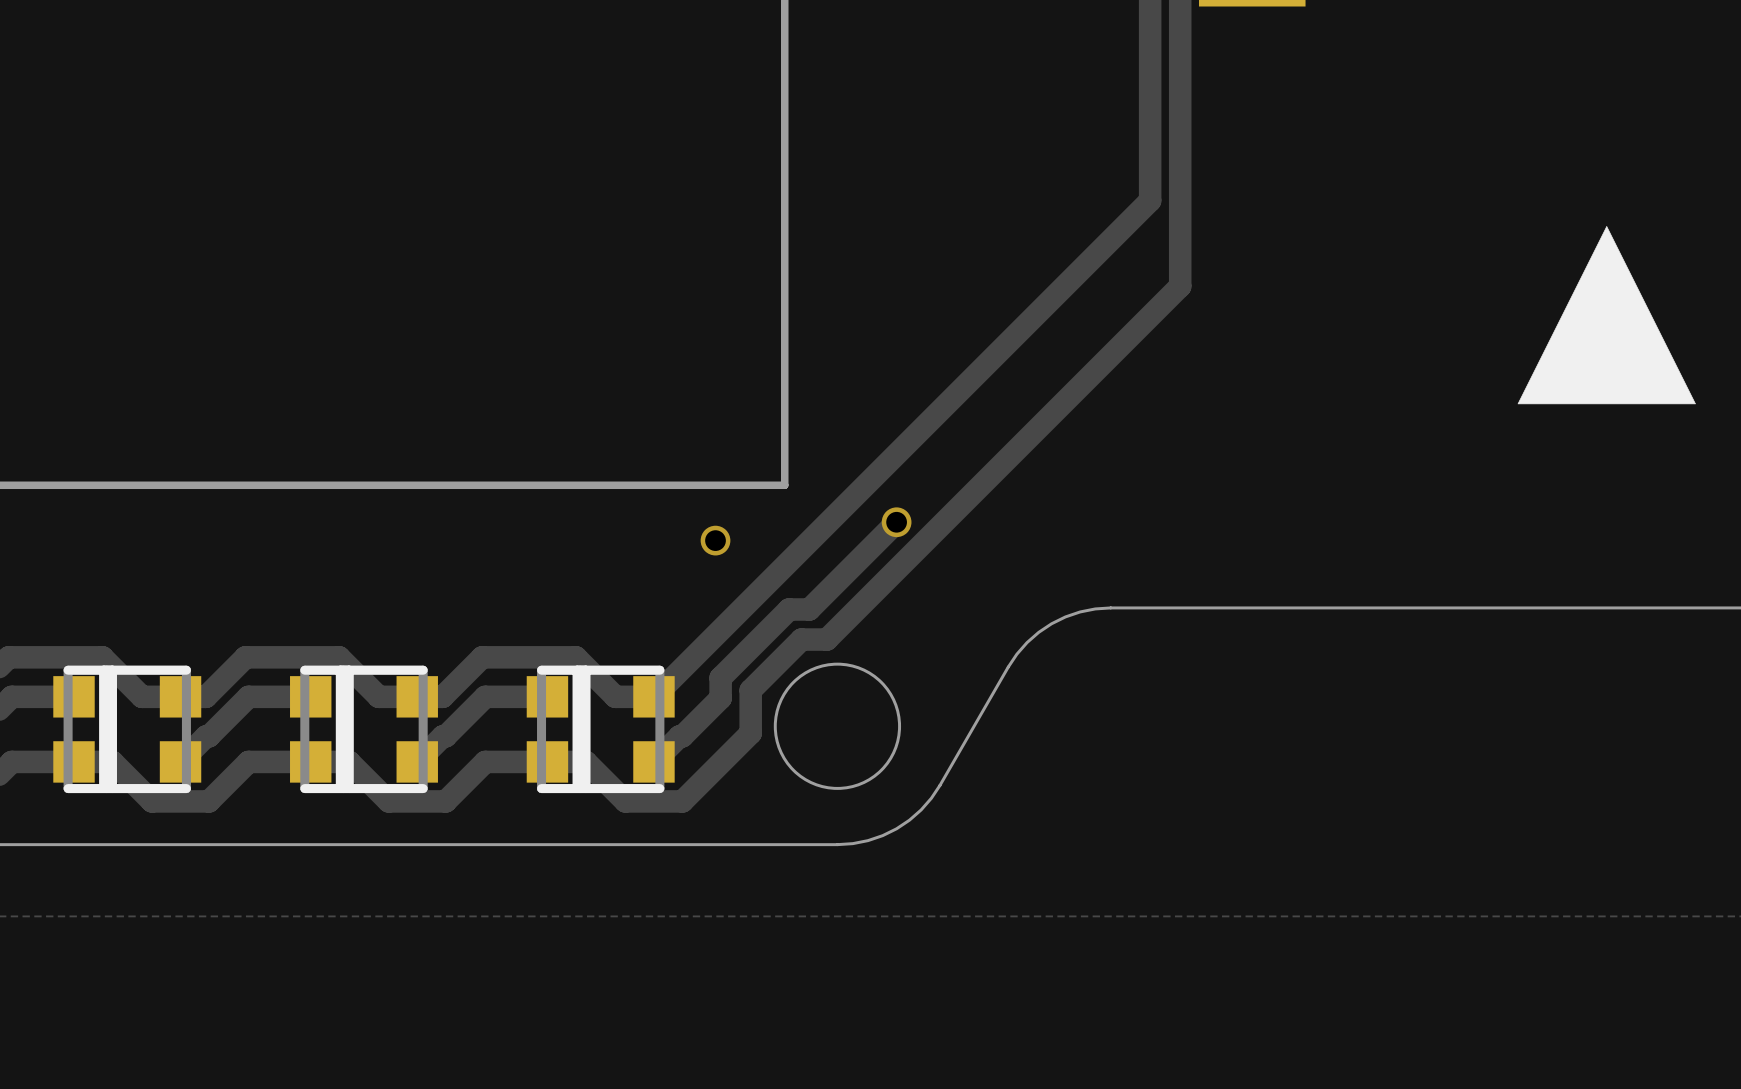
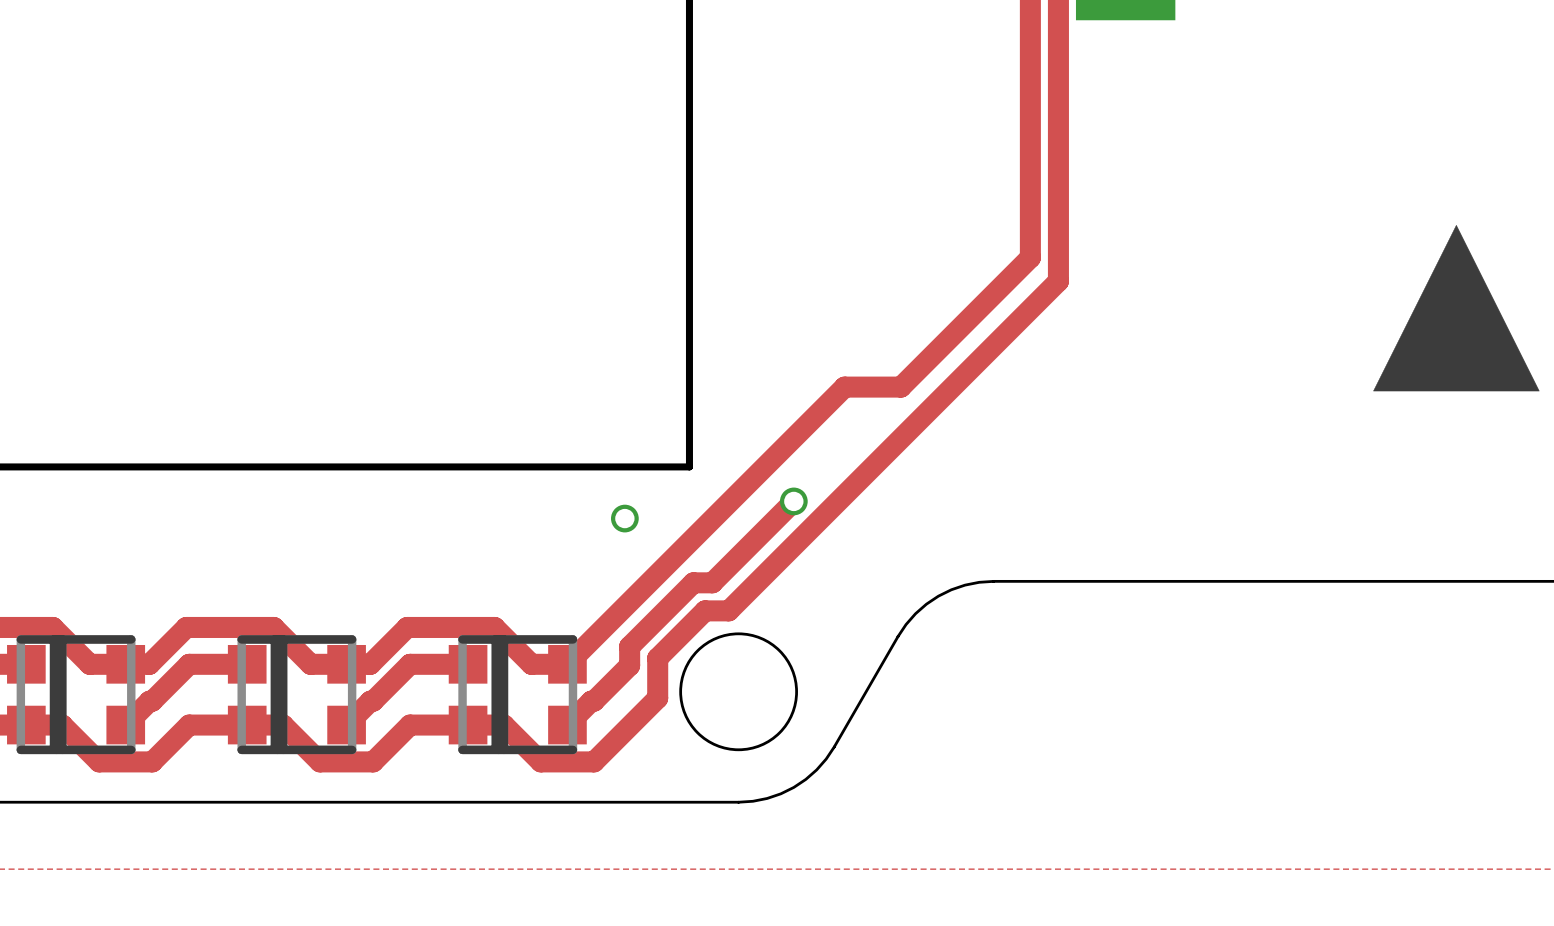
track: (1150, 200) (951, 399) -> (1030, 201) (1030, 257) (900, 387) (844, 387)

